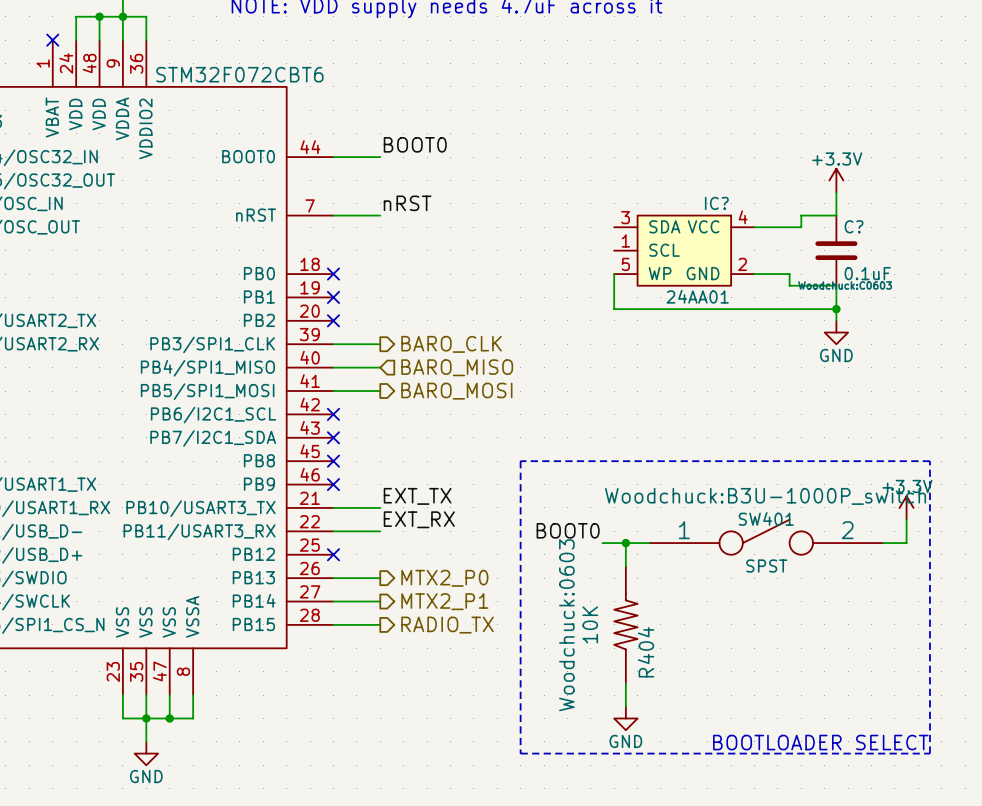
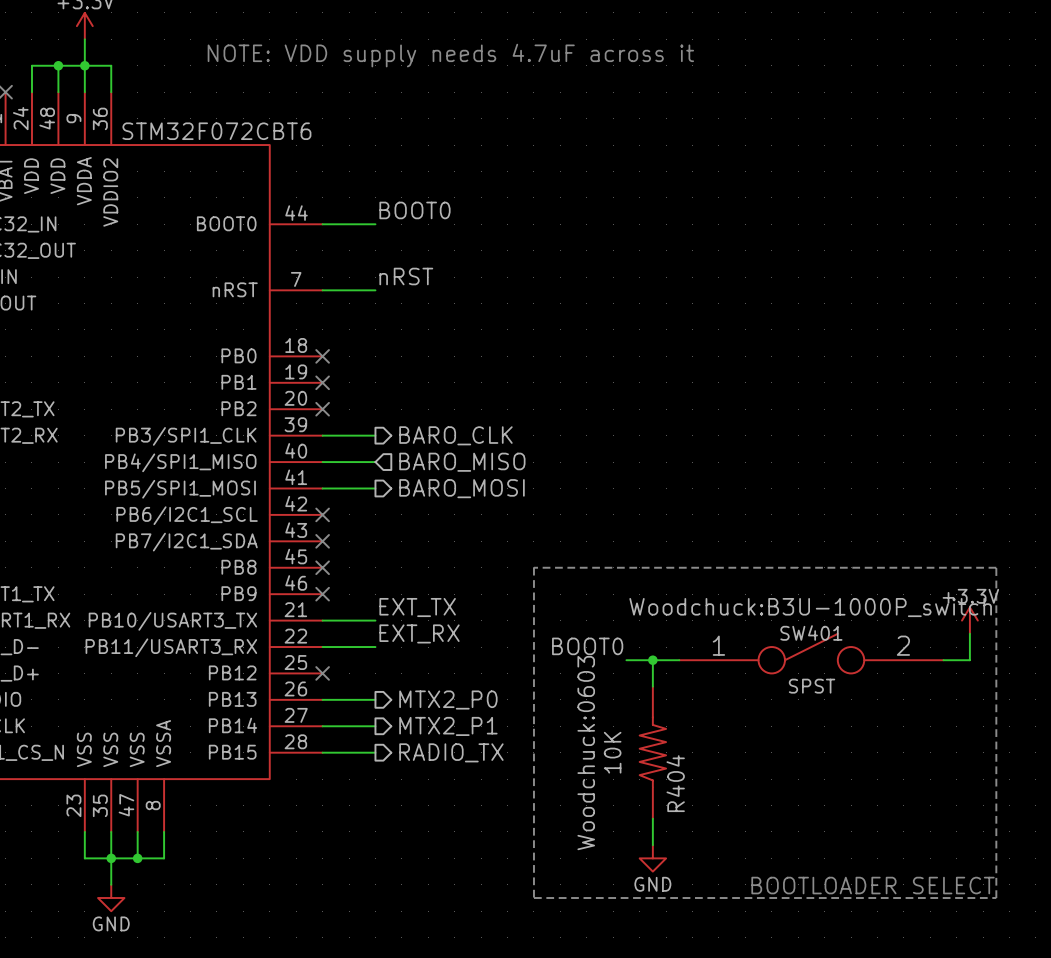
power symbol: +3.3V (836, 180) -> none
wire: (836, 192) (836, 215) (801, 215) (801, 227) (754, 227) -> none
IC?: 24AA01 (684, 250) -> none
C?: 0.1uF (836, 250) -> none
wire: (614, 274) (614, 309) (836, 309) -> none
wire: (754, 274) (789, 274) (789, 285) (836, 285) (836, 320) -> none
junction: (836, 309) -> none
power symbol: GND (836, 332) -> none

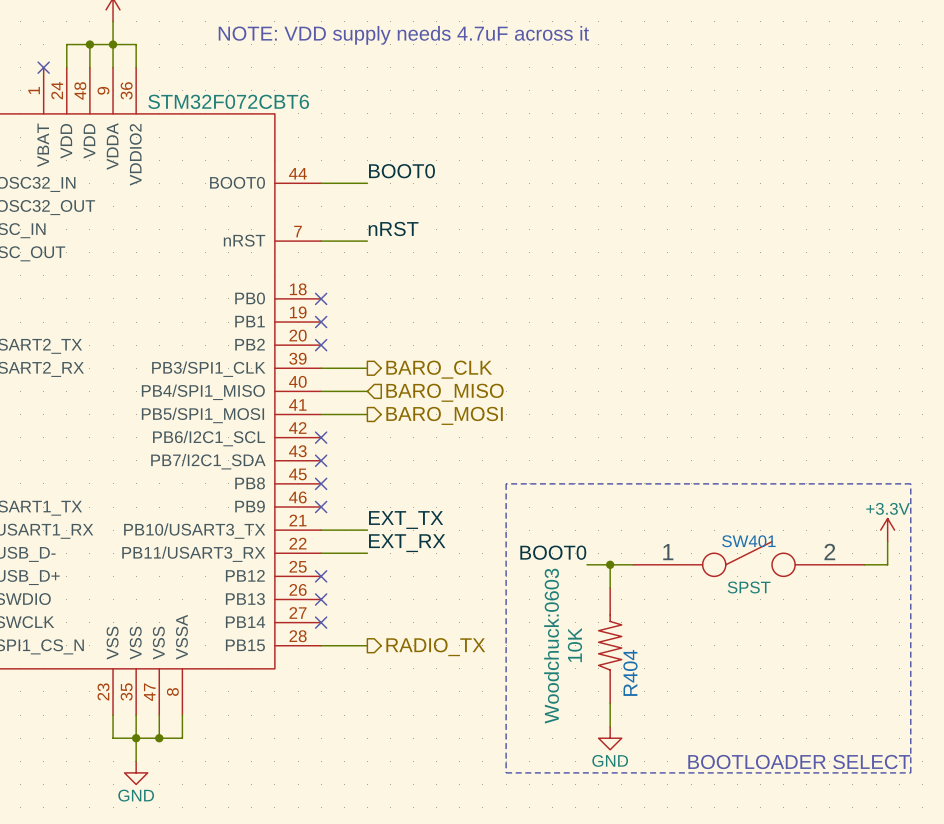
SW401 text: Woodchuck:B3U-1000P_switch (810, 607) -> none
wire: (322, 699) (375, 699) -> none
no-connect mark: none -> (321, 599)
hierarchical label: MTX2_P0 (448, 700) -> none
wire: (322, 726) (375, 726) -> none
no-connect mark: none -> (321, 622)
hierarchical label: MTX2_P1 (448, 726) -> none

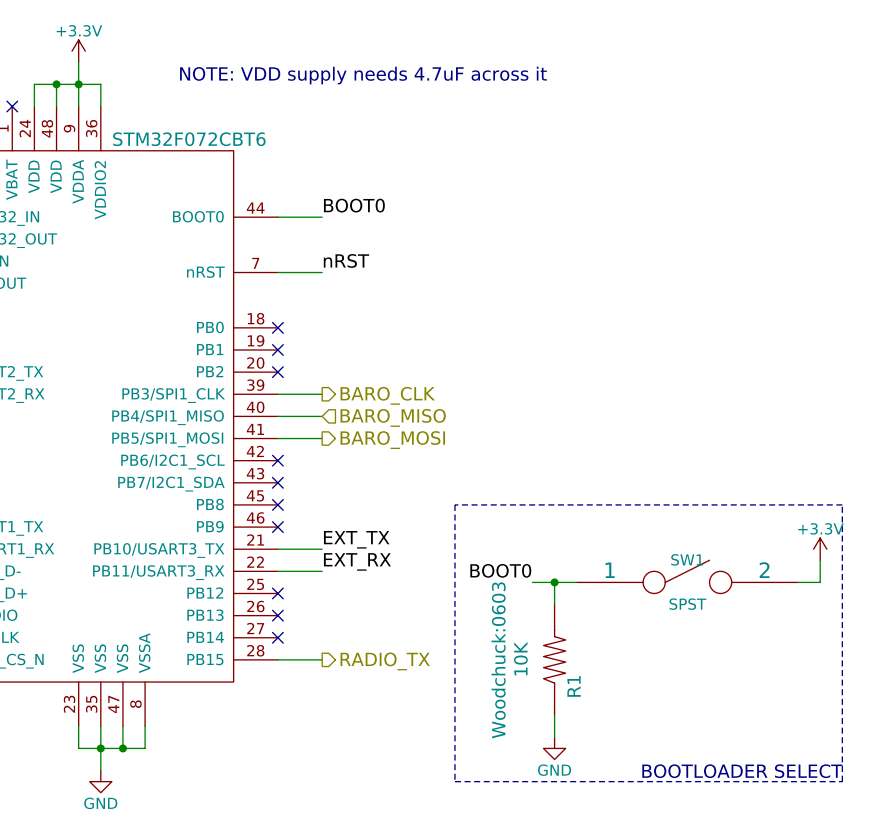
SW401 name: SW401 (748, 541) -> SW1 (687, 559)
R404 name: R404 (630, 672) -> R1 (574, 686)

